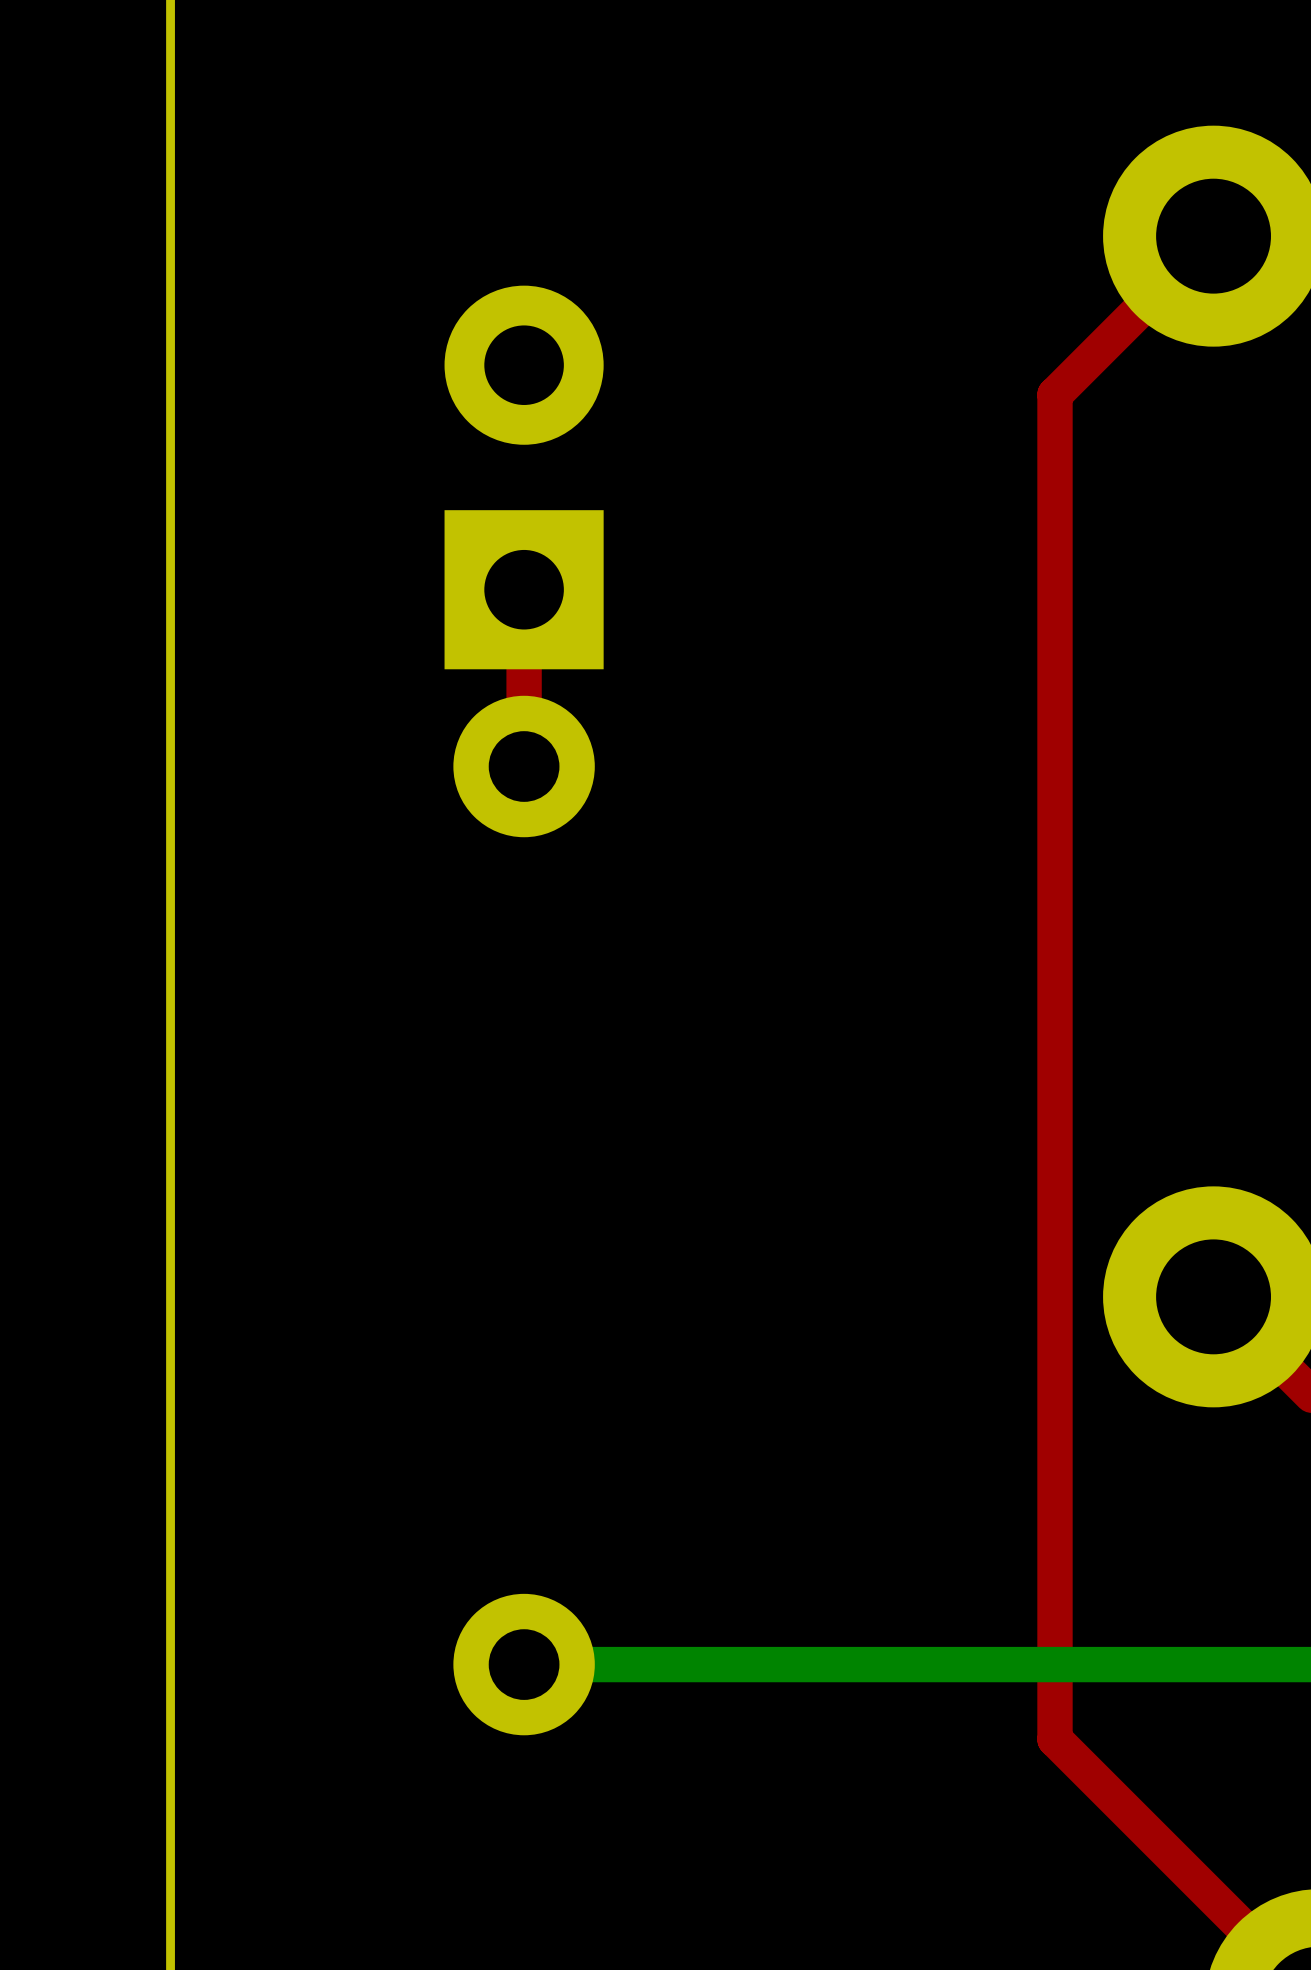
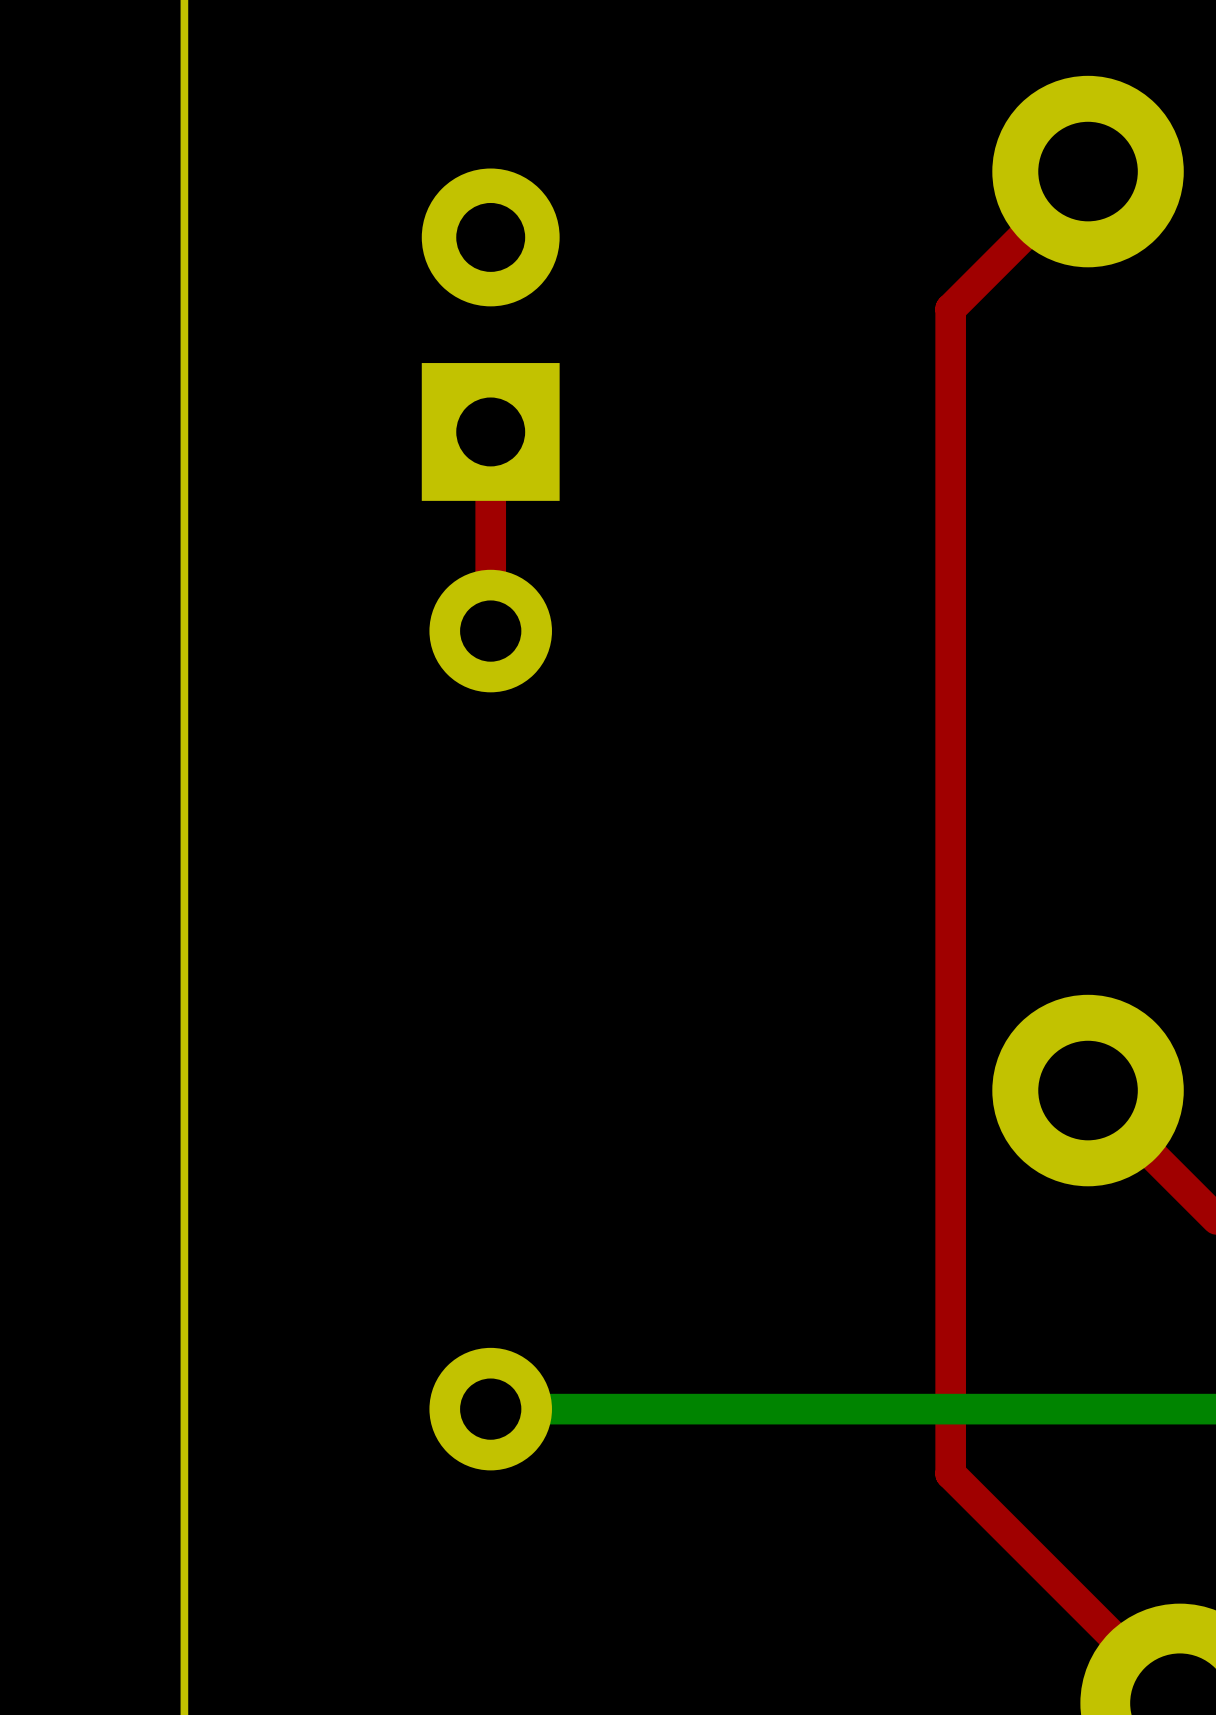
part position: (524, 477) -> (490, 334)

